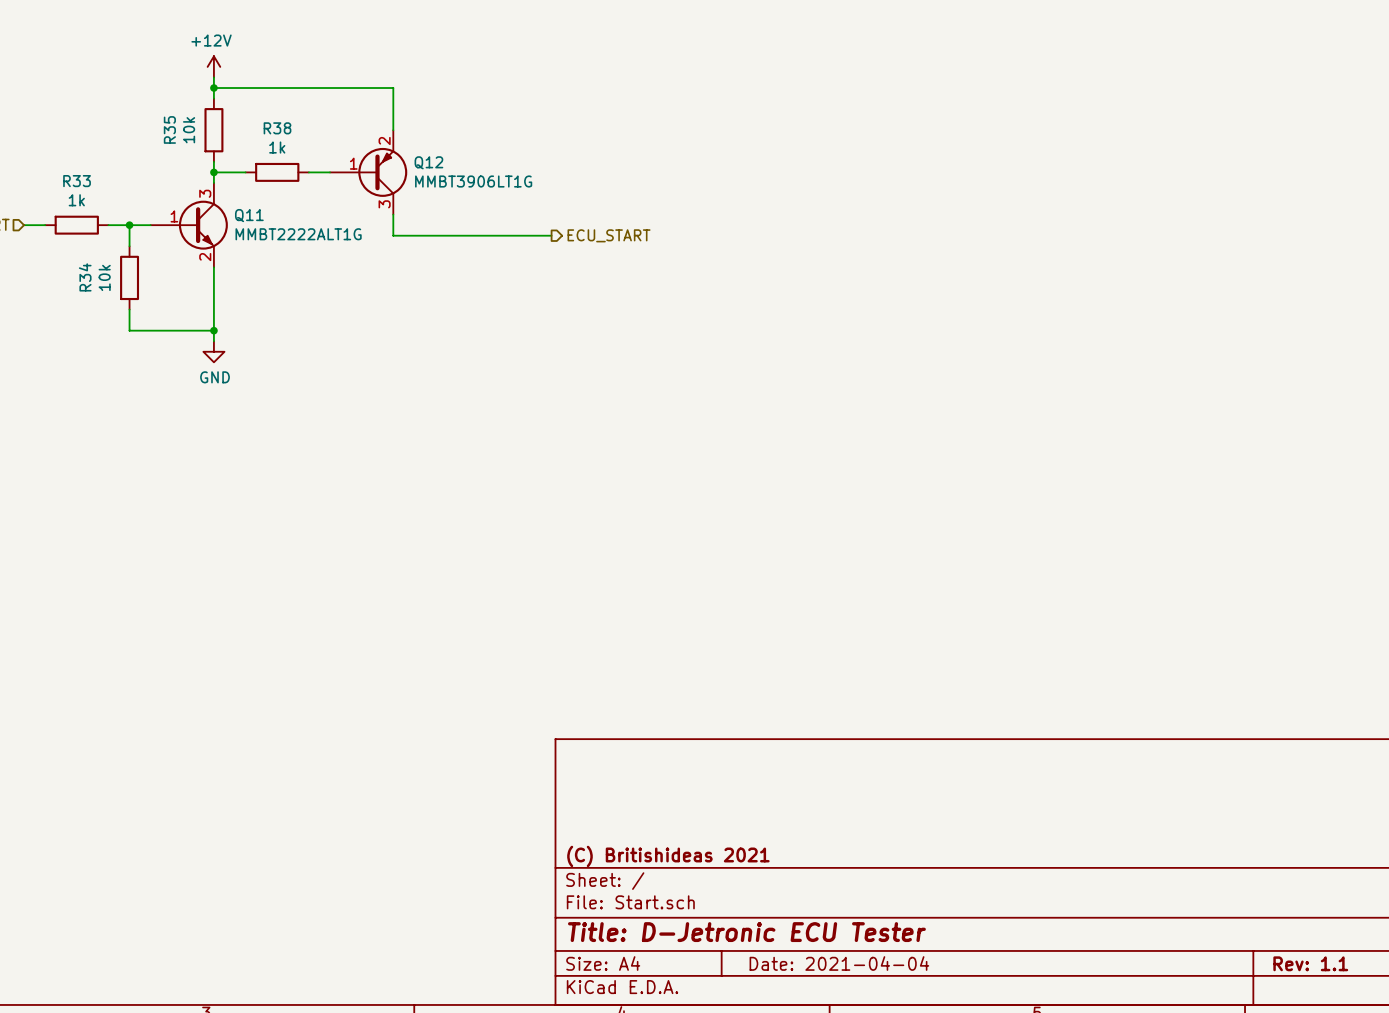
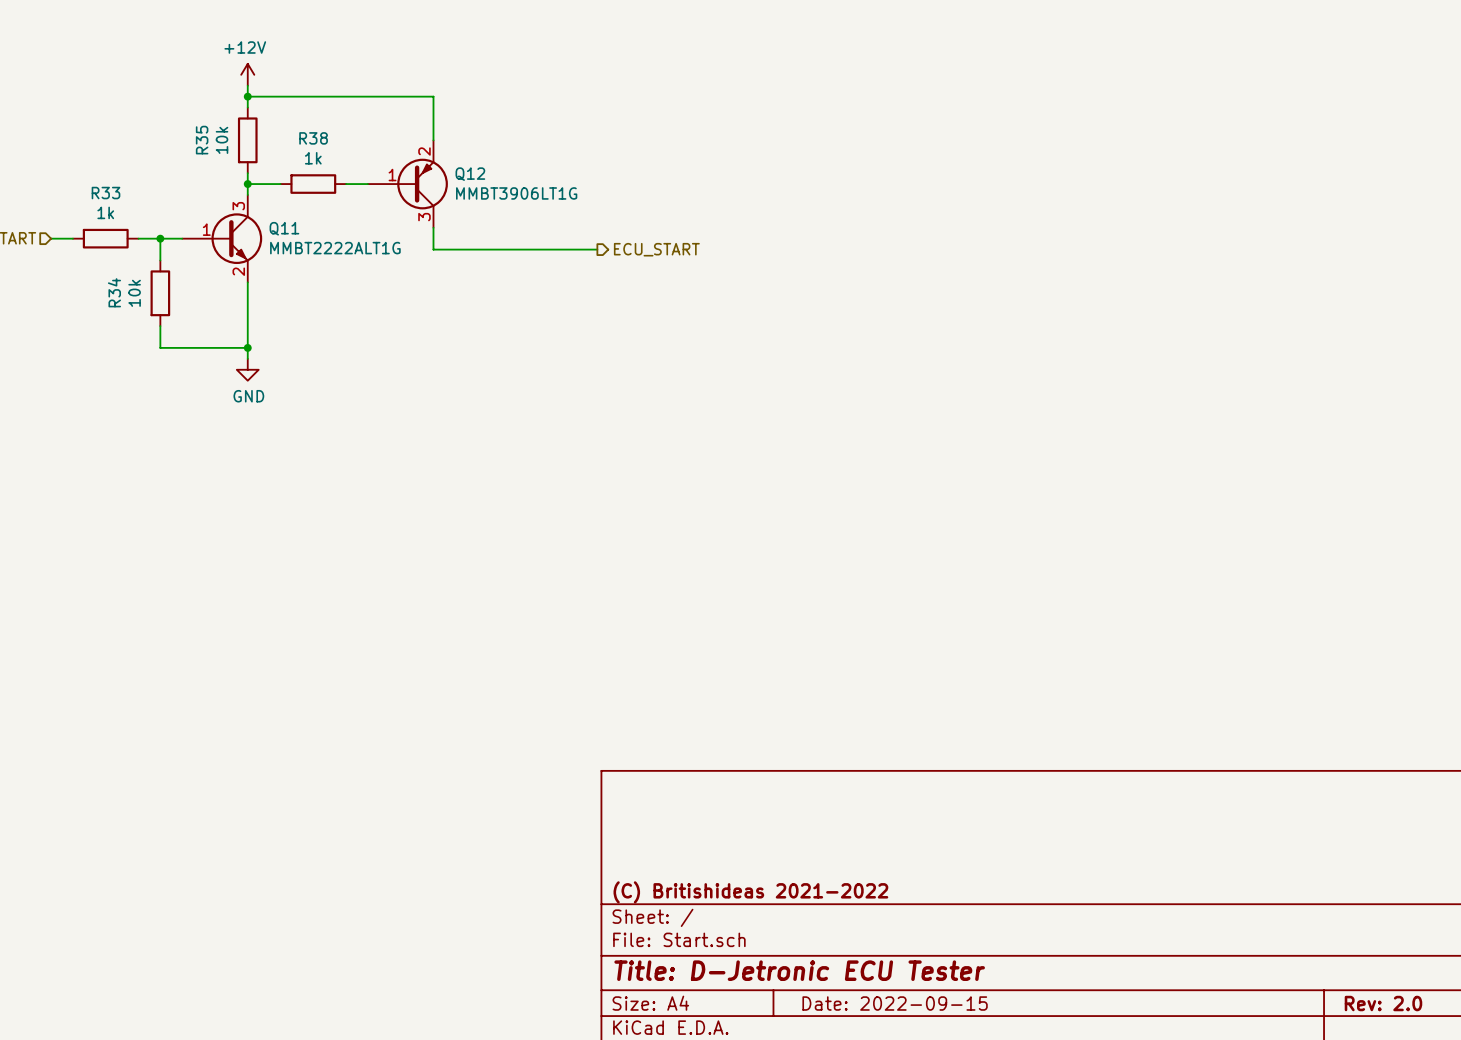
title block: (C) Britishideas 2021 (668, 856) -> (C) Britishideas 2021-2022 (750, 892)
title block: Date: 2021-04-04 (839, 963) -> Date: 2022-09-15 (895, 1003)
title block: Rev: 1.1 (1310, 963) -> Rev: 2.0 (1383, 1003)

